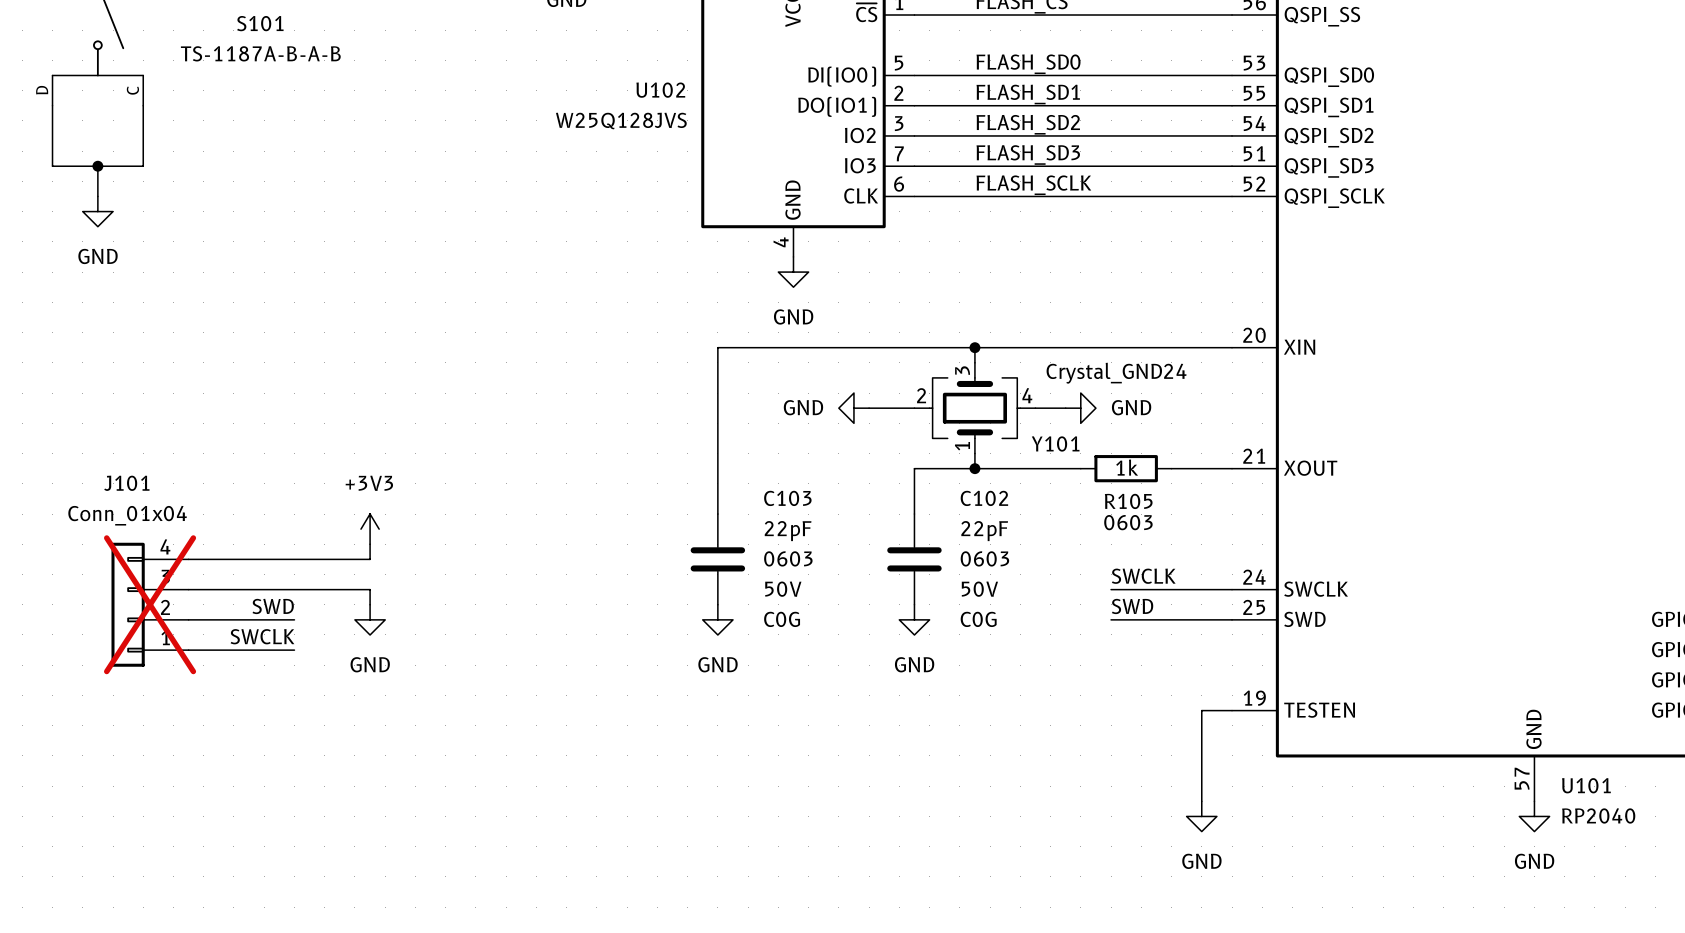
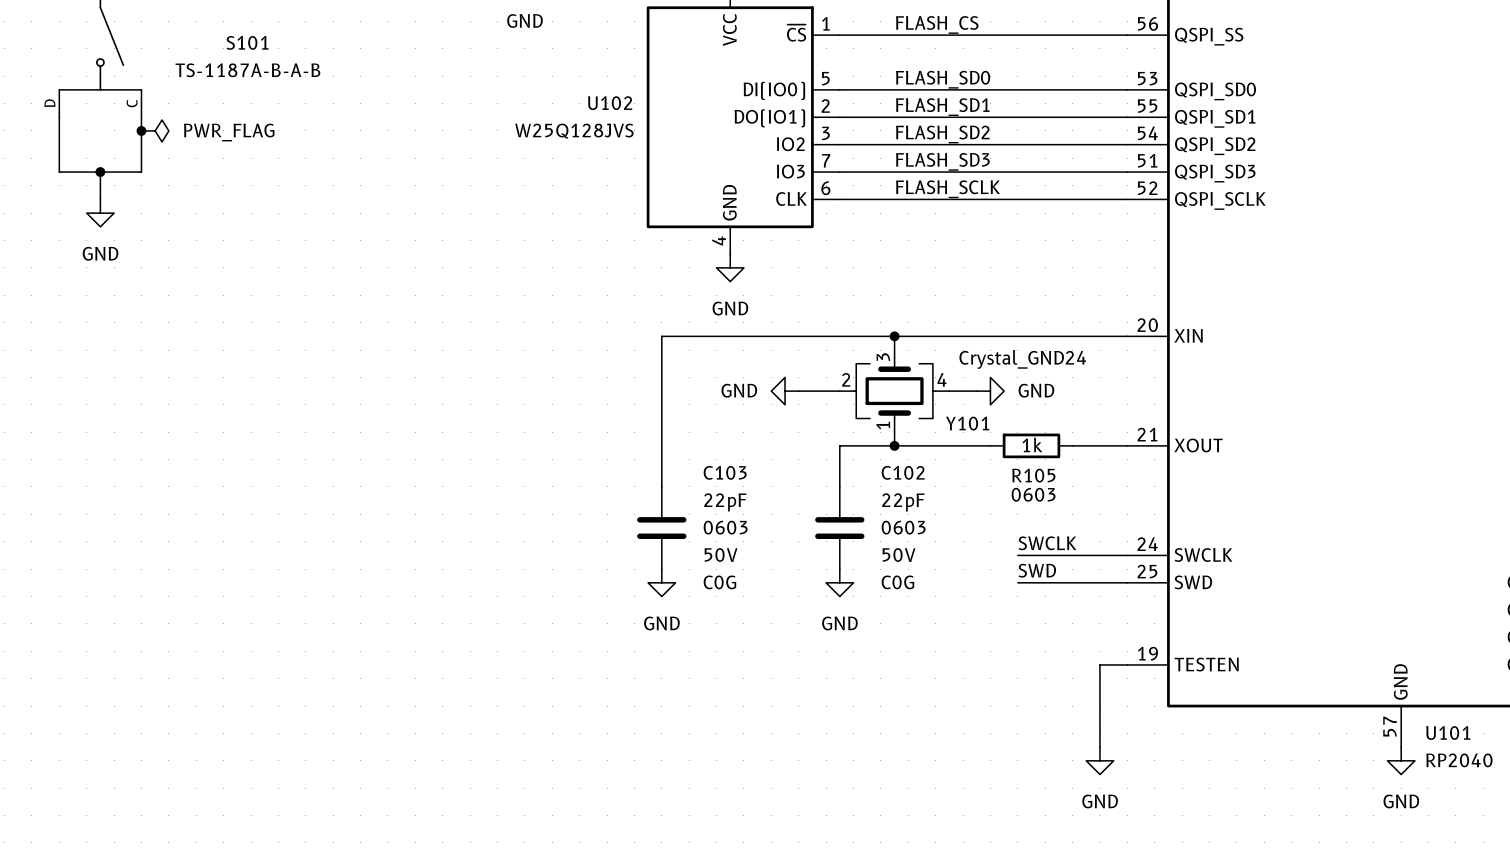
junction: none -> (141, 130)
power symbol: none -> PWR_FLAG (155, 130)
power symbol: +3V3 (370, 529) -> none
wire: (370, 544) (370, 559) (188, 559) -> none
wire: (188, 589) (370, 589) (370, 604) -> none
J101: Conn_01x04 (150, 604) -> none
label: SWD (273, 606) -> none
wire: (188, 619) (294, 619) -> none
power symbol: GND (370, 619) -> none
label: SWCLK (262, 636) -> none
wire: (188, 650) (294, 650) -> none

